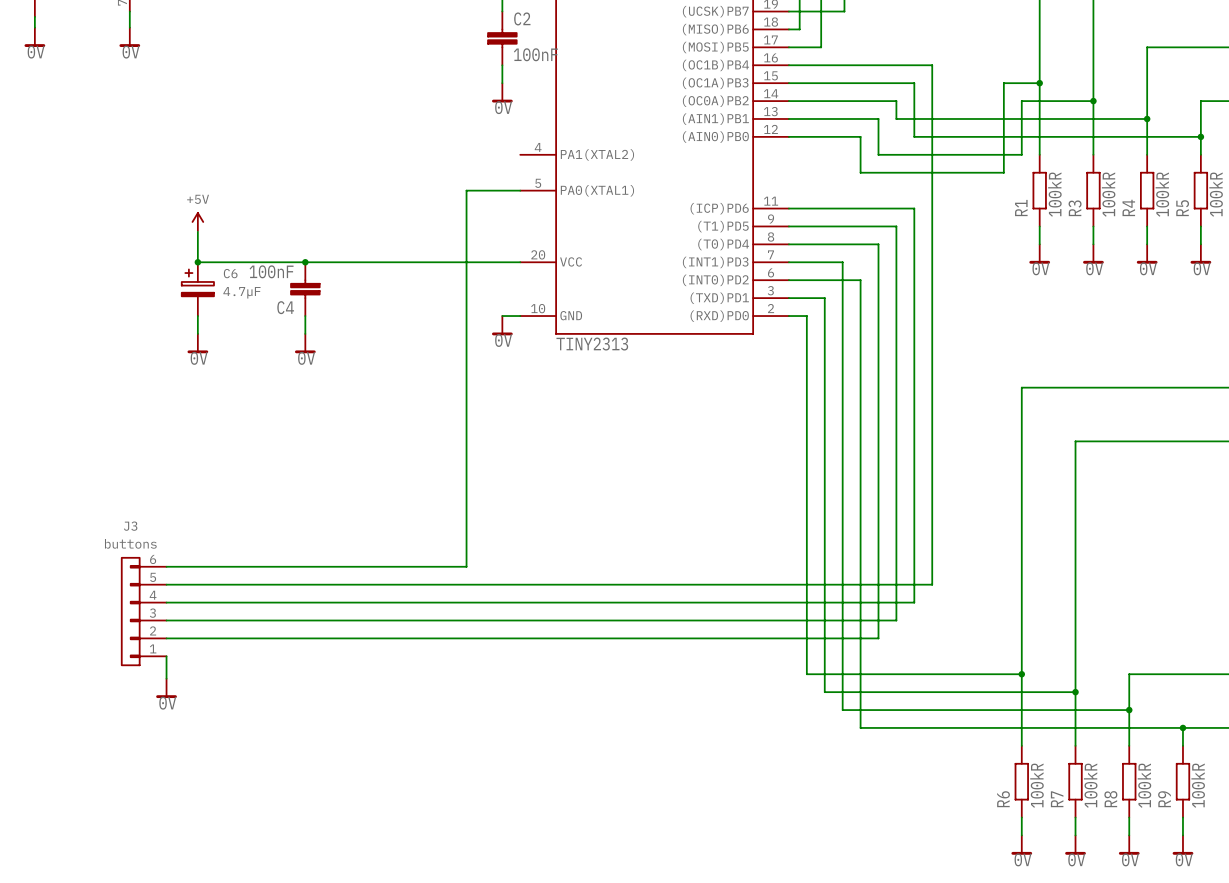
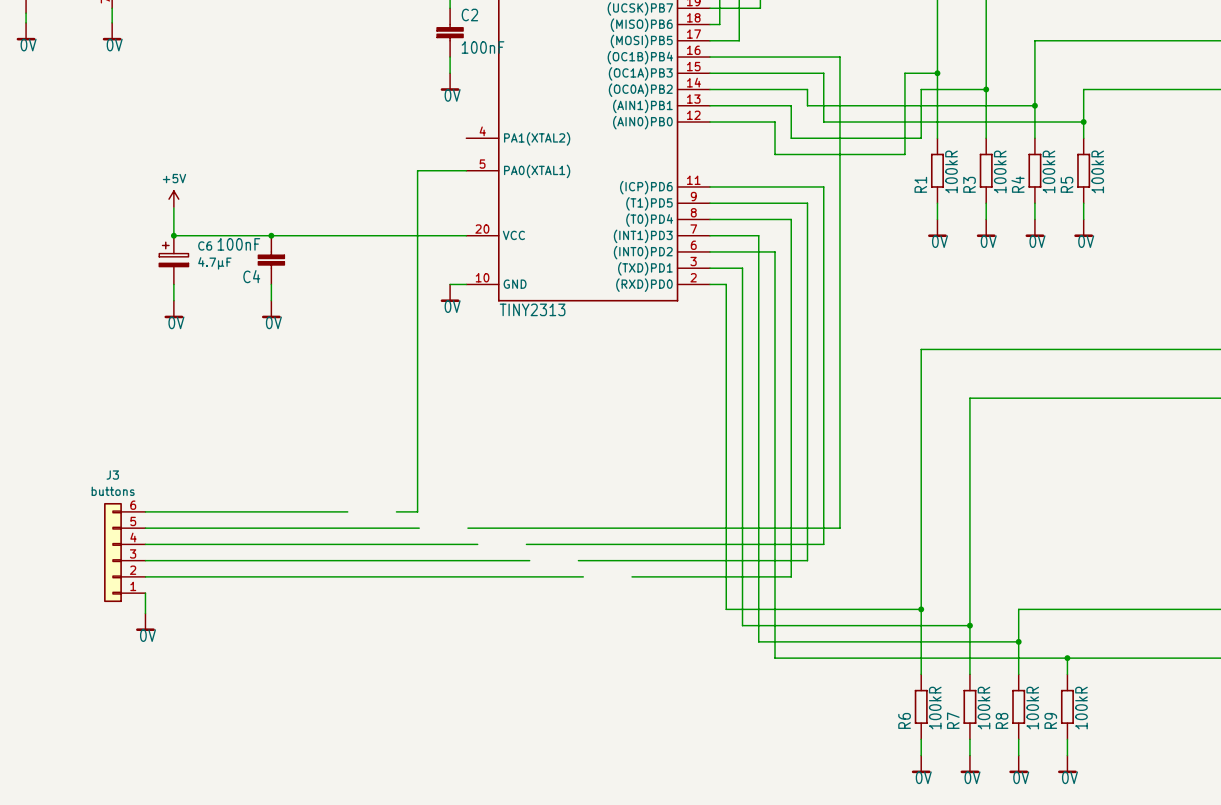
wire: (389, 566) (443, 566) -> none
wire: (468, 584) (522, 584) -> none
wire: (532, 602) (586, 602) -> none
wire: (590, 620) (643, 620) -> none
wire: (649, 638) (702, 638) -> none

